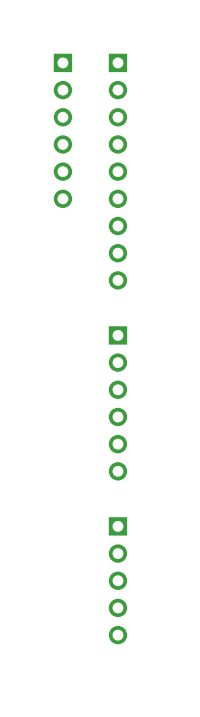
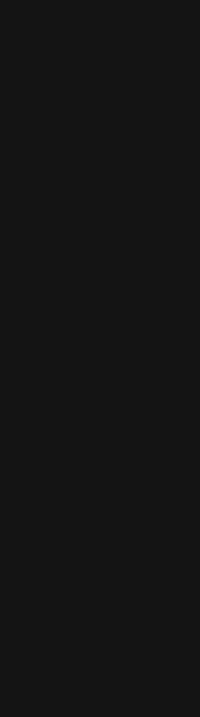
part: (62, 130) -> none
part: (117, 171) -> none
part: (117, 403) -> none
part: (117, 580) -> none

